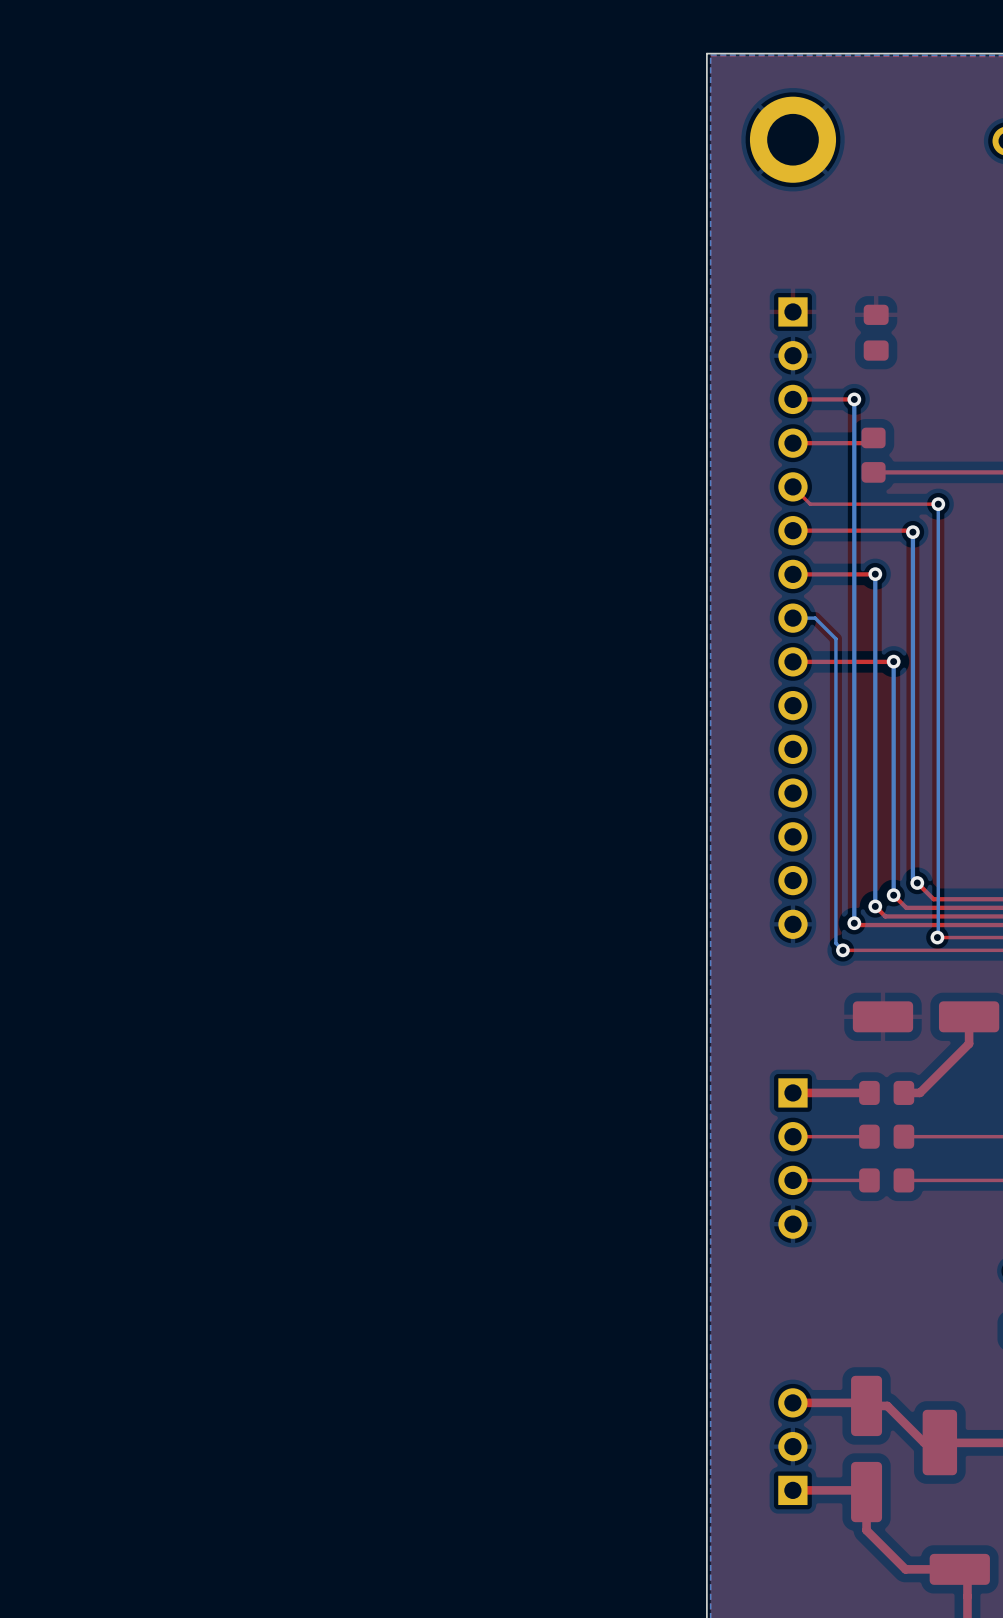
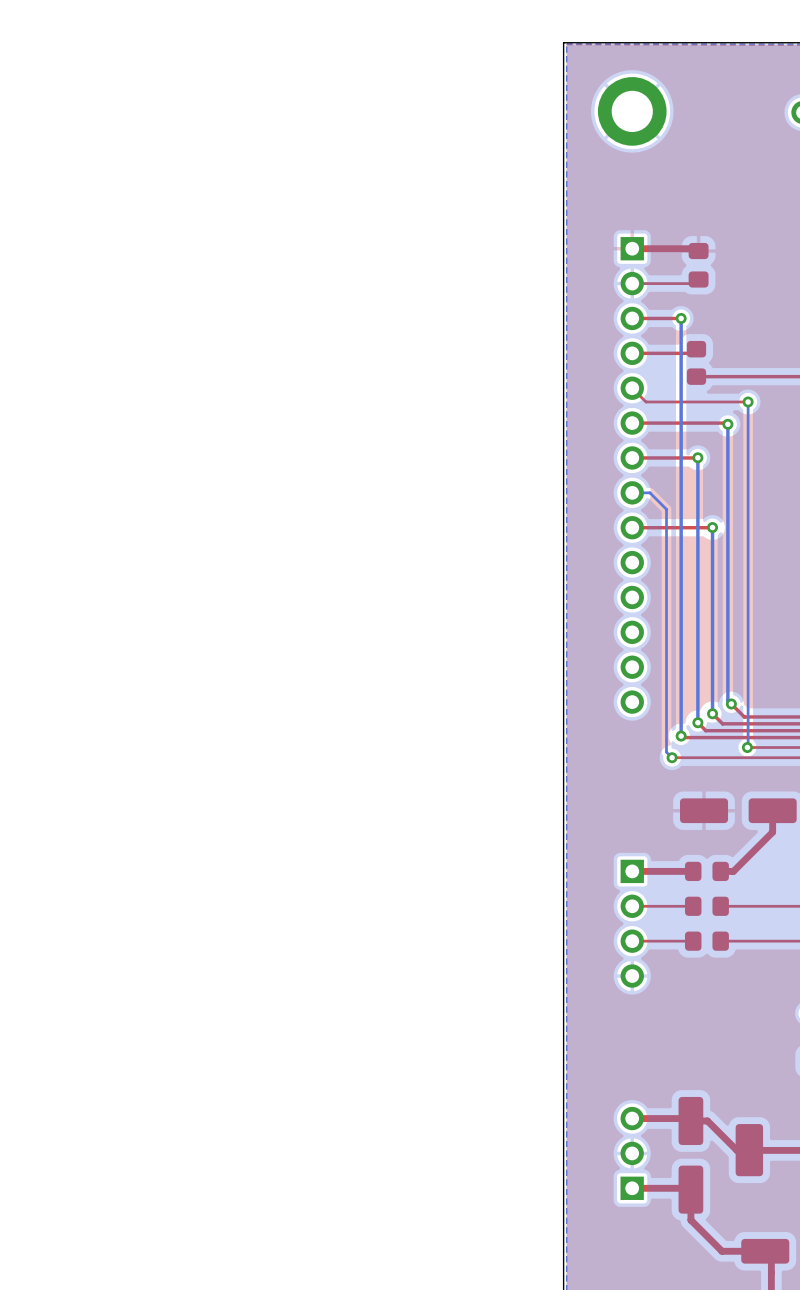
top track: none -> (696, 248) (632, 248)
top track: none -> (694, 283) (632, 283)
part: none -> (632, 475)
part: (792, 618) -> none

